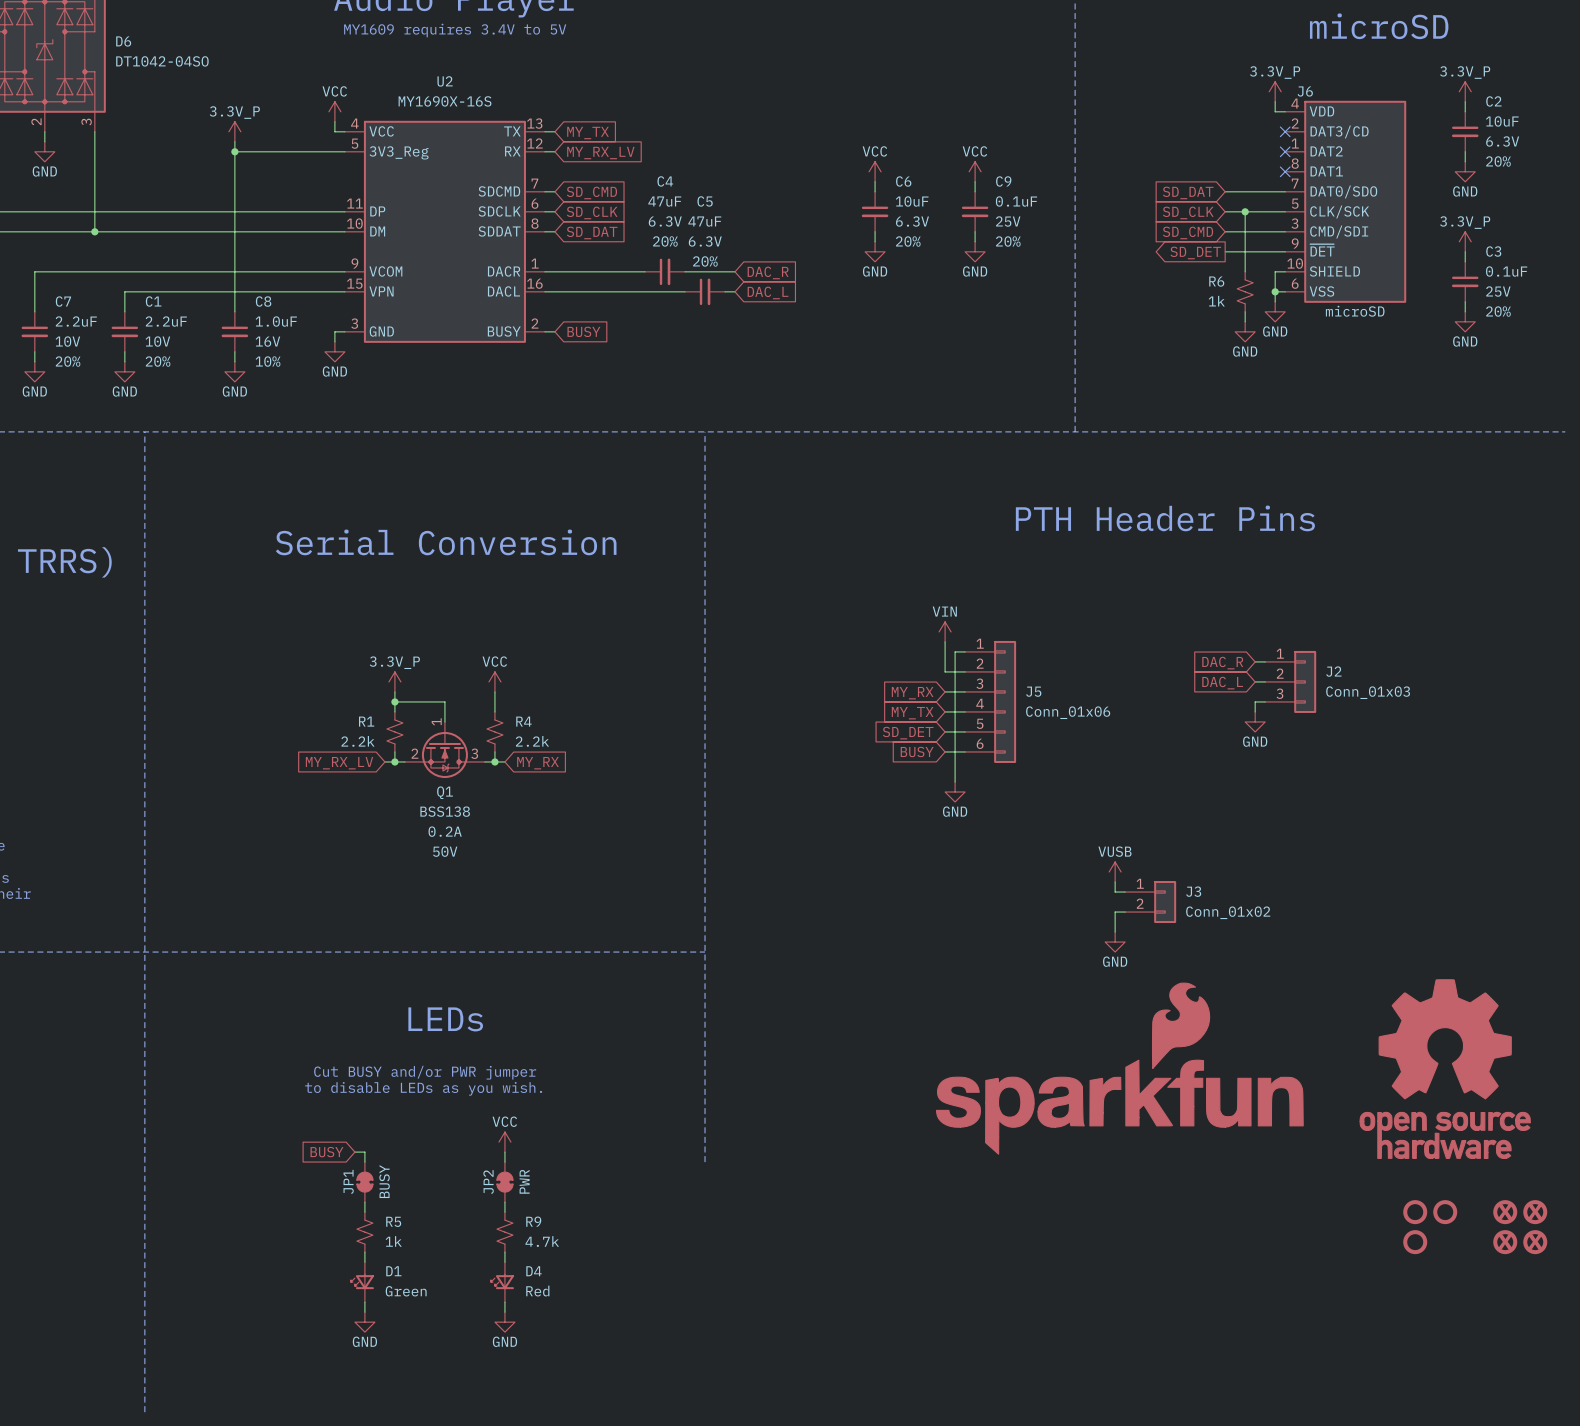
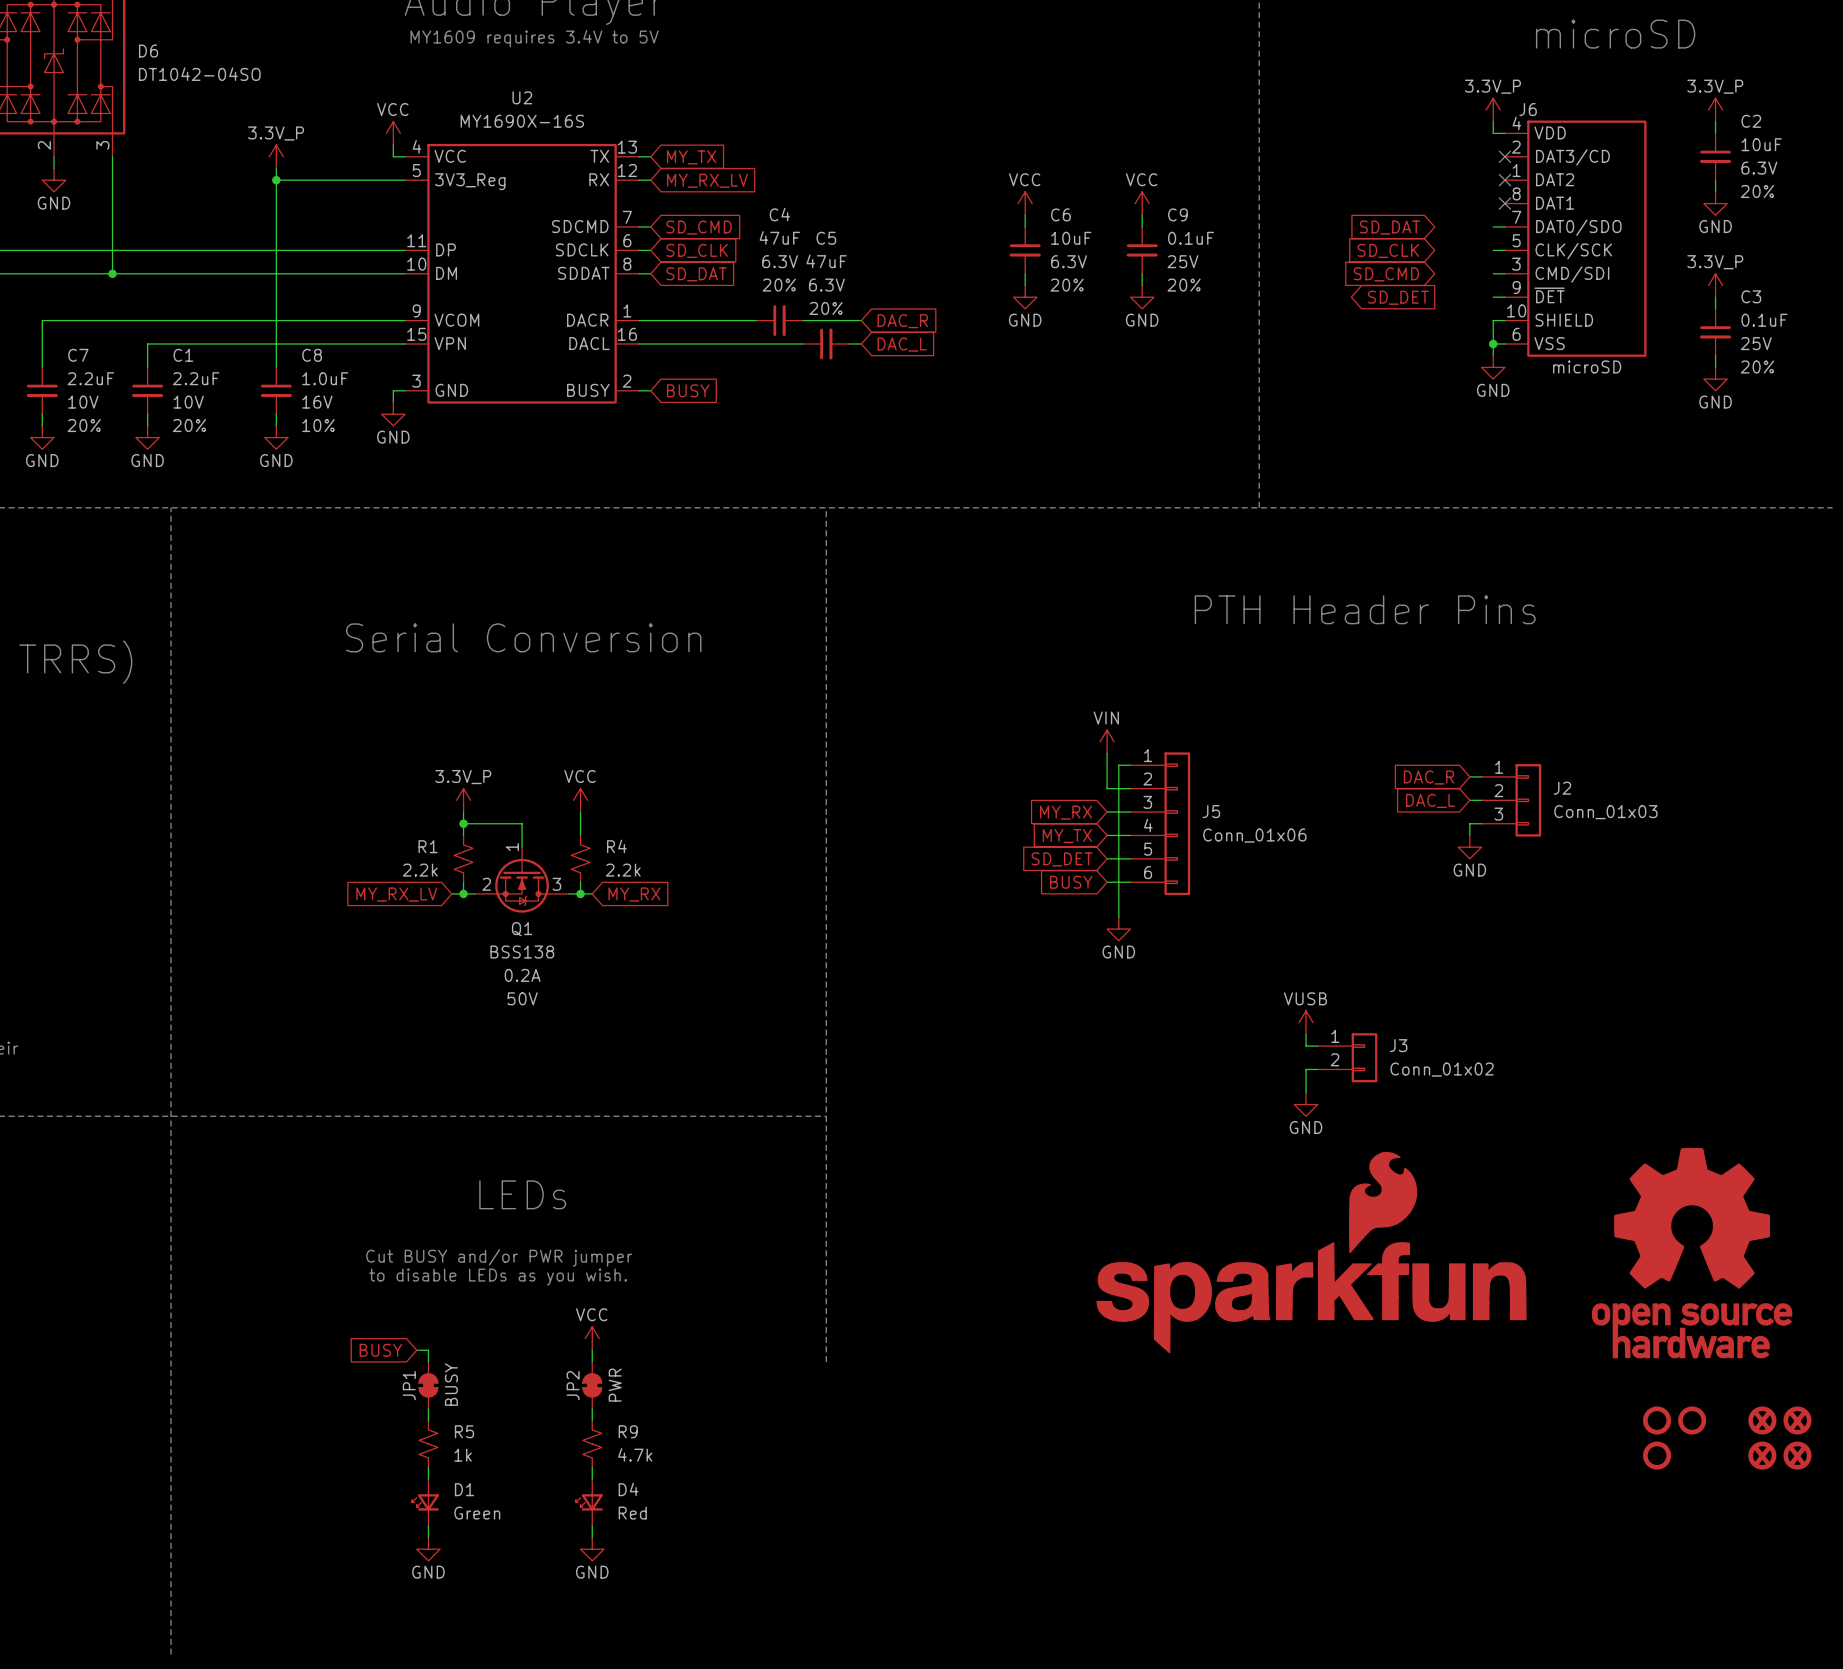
wire: (1225, 191) (1275, 191) -> none
wire: (1225, 211) (1275, 211) -> none
wire: (1245, 211) (1245, 271) -> none
junction: (1245, 211) -> none
wire: (1225, 231) (1275, 231) -> none
wire: (1225, 251) (1275, 251) -> none
R6: 1k (1245, 291) -> none
wire: (1245, 311) (1245, 321) -> none
power symbol: GND (1245, 331) -> none

